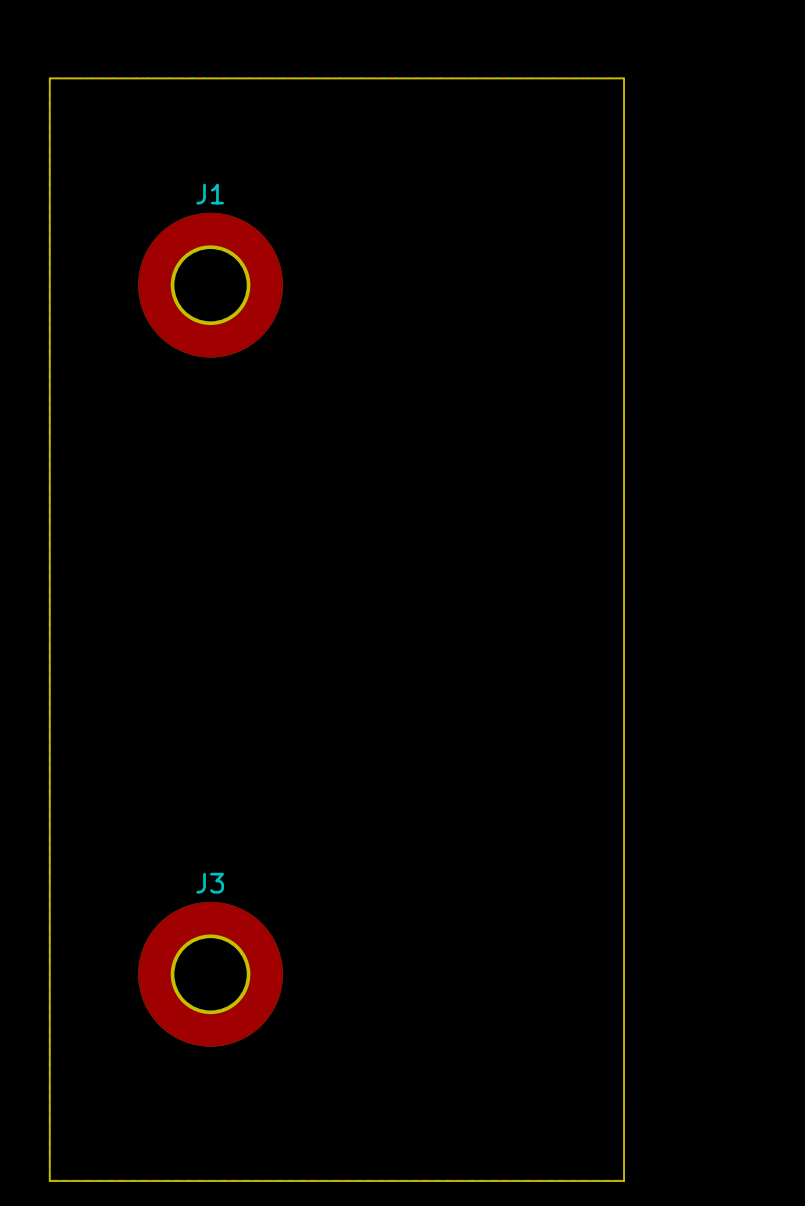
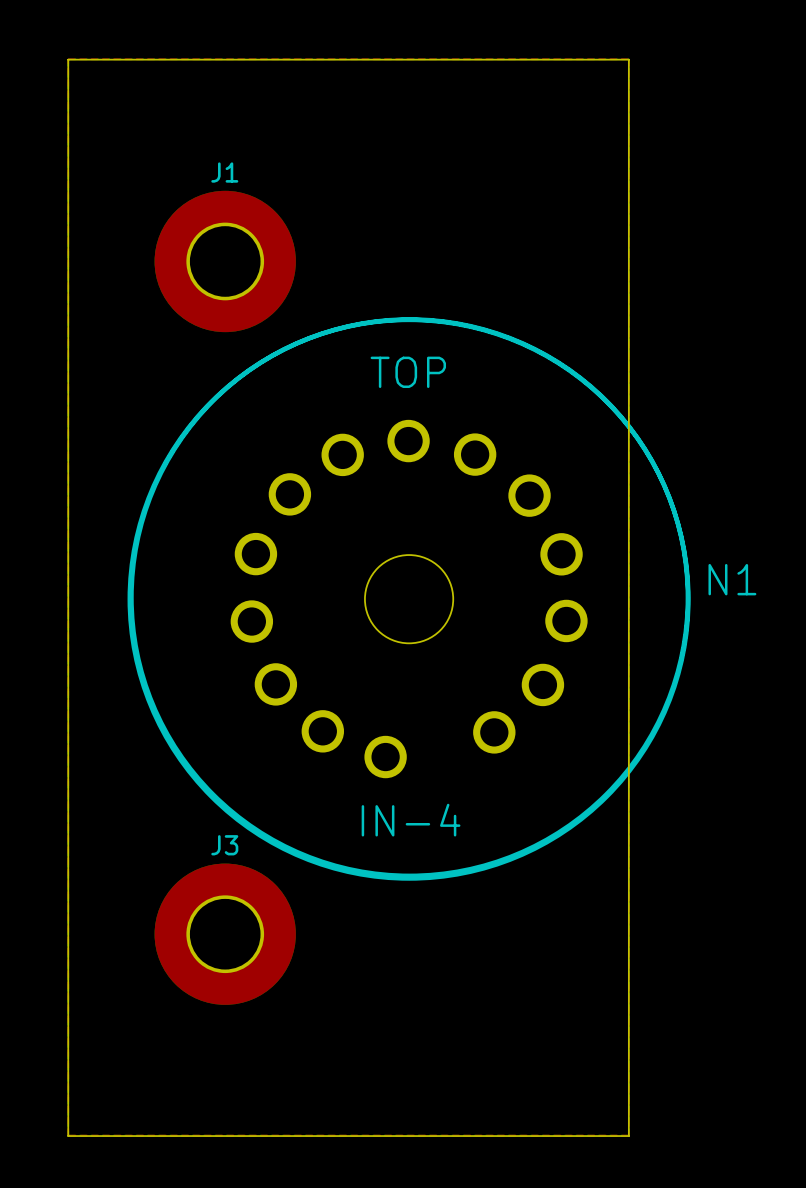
N1: none -> IN-4 (409, 598)

